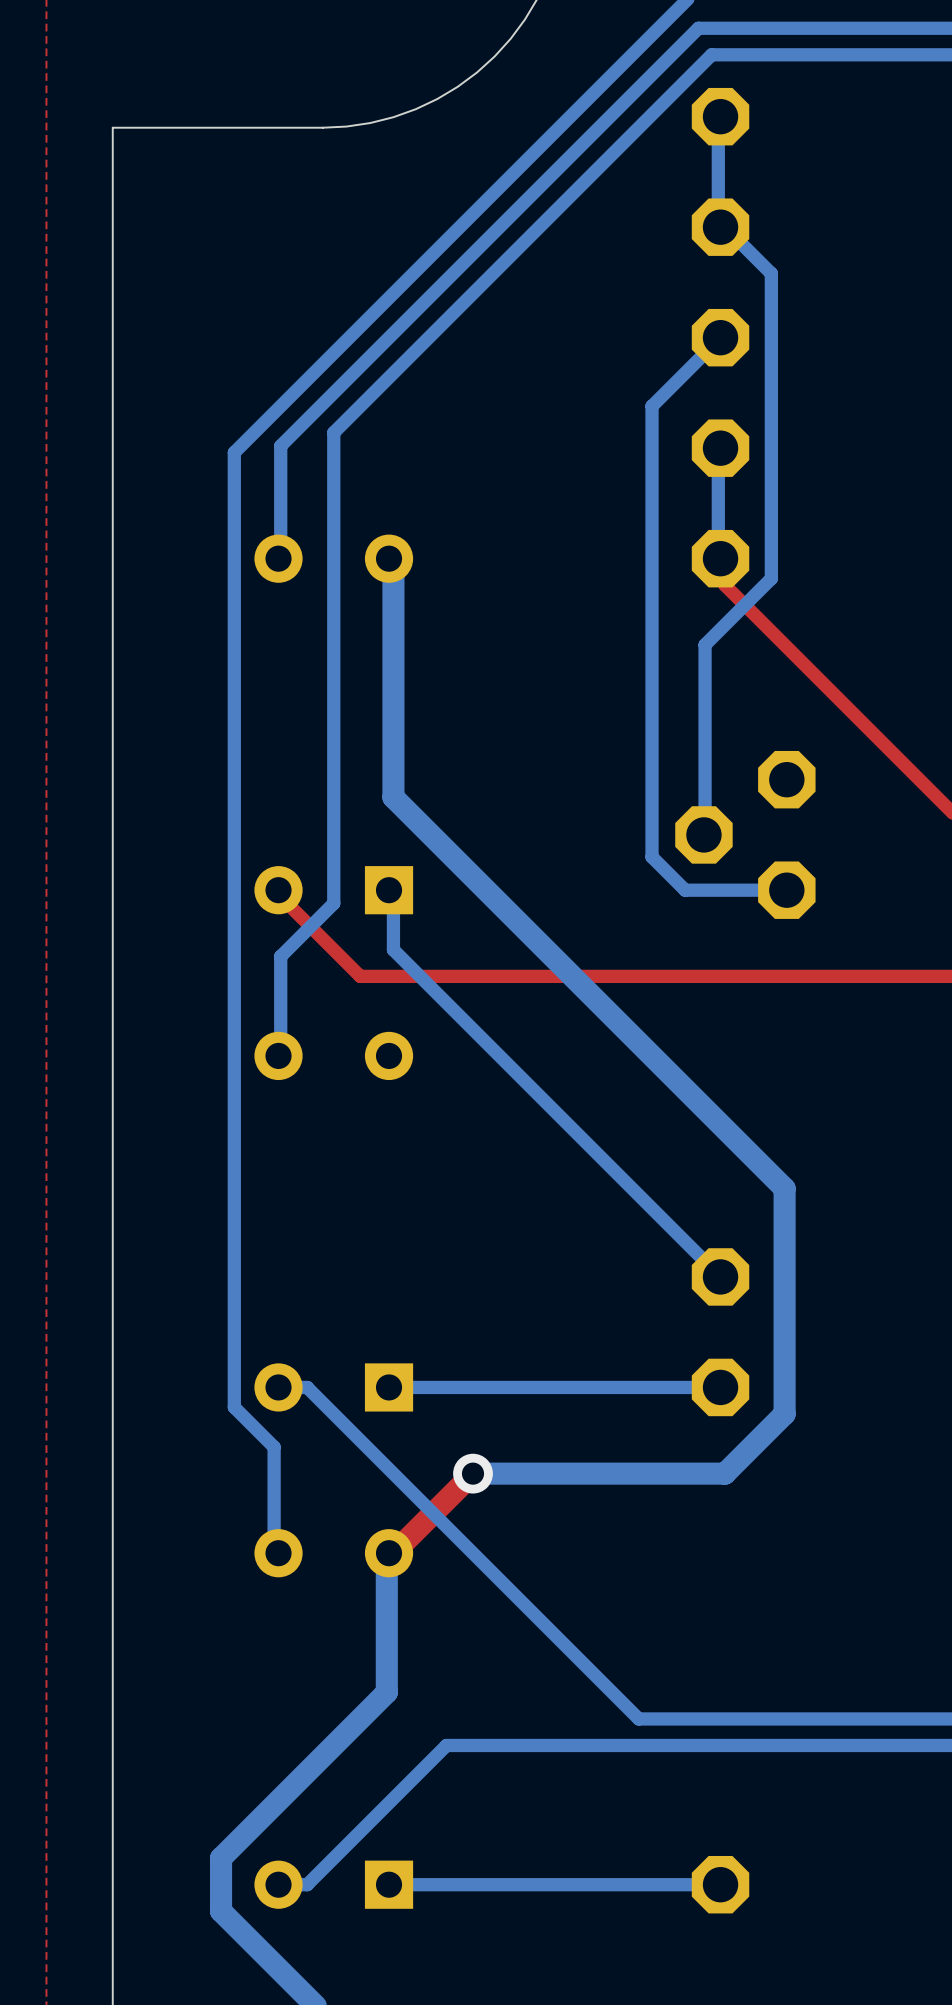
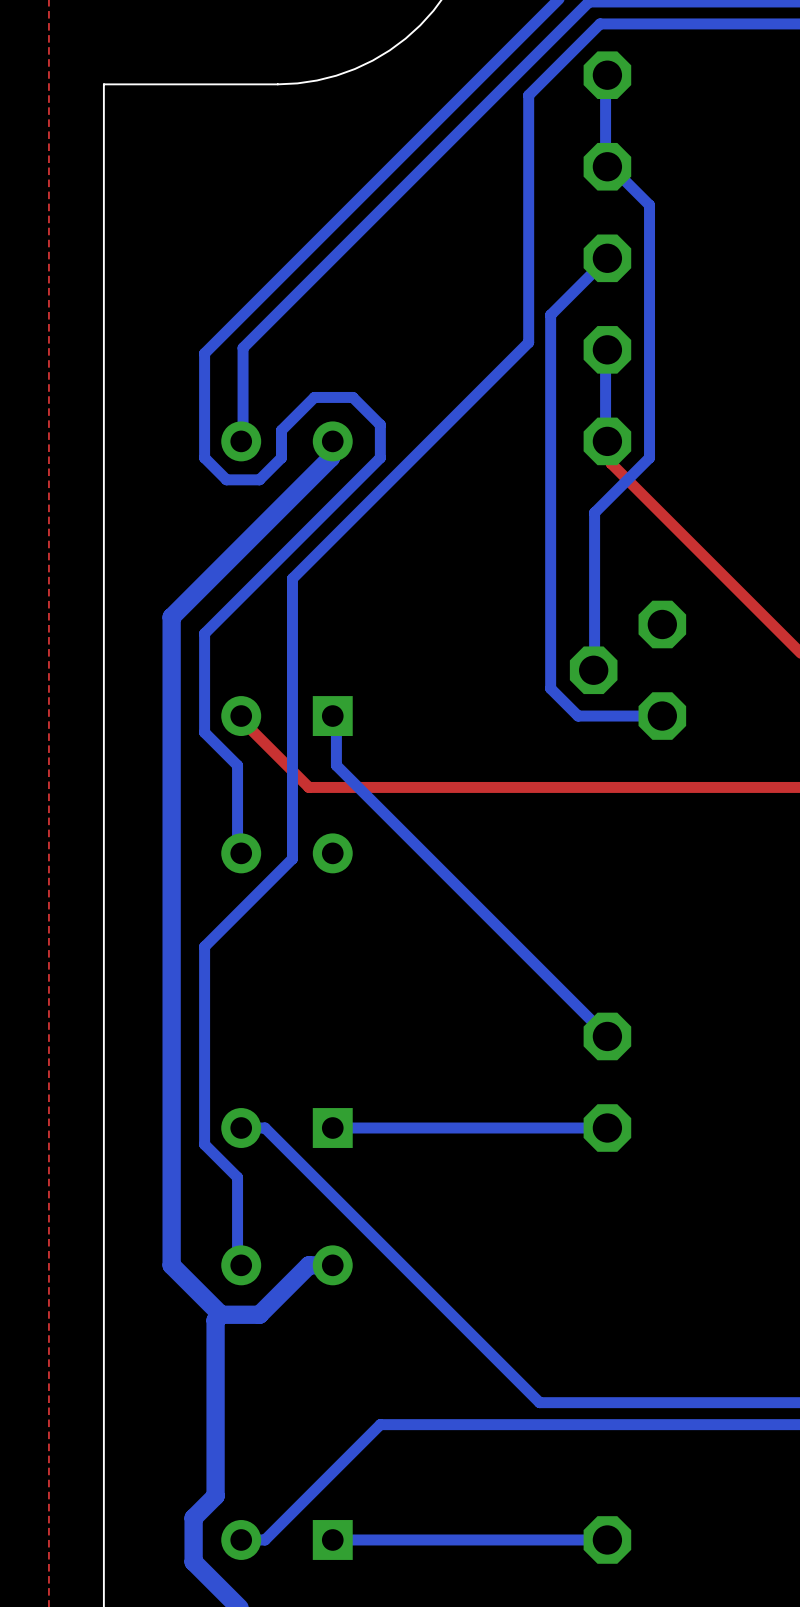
bottom track: (625, 140) (333, 432) (333, 903) (280, 956) (280, 1055) (278, 1055) -> (528, 95) (528, 342) (292, 578) (292, 858) (204, 946)
bottom track: (389, 558) (393, 558) (393, 797) (784, 1188) (784, 1413) (724, 1473) (473, 1473) -> (332, 441) (330, 441) (330, 457) (171, 617) (171, 1265) (221, 1314)
bottom track: (234, 578) (234, 790) -> (204, 457) (226, 479) (259, 479) (281, 457) (281, 430) (314, 397) (352, 397) (380, 424) (380, 457) (204, 633)
bottom track: (234, 910) (234, 1168) -> (204, 732) (237, 765) (237, 853) (241, 853)
top track: (473, 1473) (393, 1553) (389, 1553) -> none
via: (473, 1473) -> none
bottom track: (386, 1553) (386, 1692) (247, 1831) -> (221, 1314) (215, 1320) (215, 1496)
bottom track: none -> (330, 1265) (308, 1265) (259, 1314) (221, 1314)

